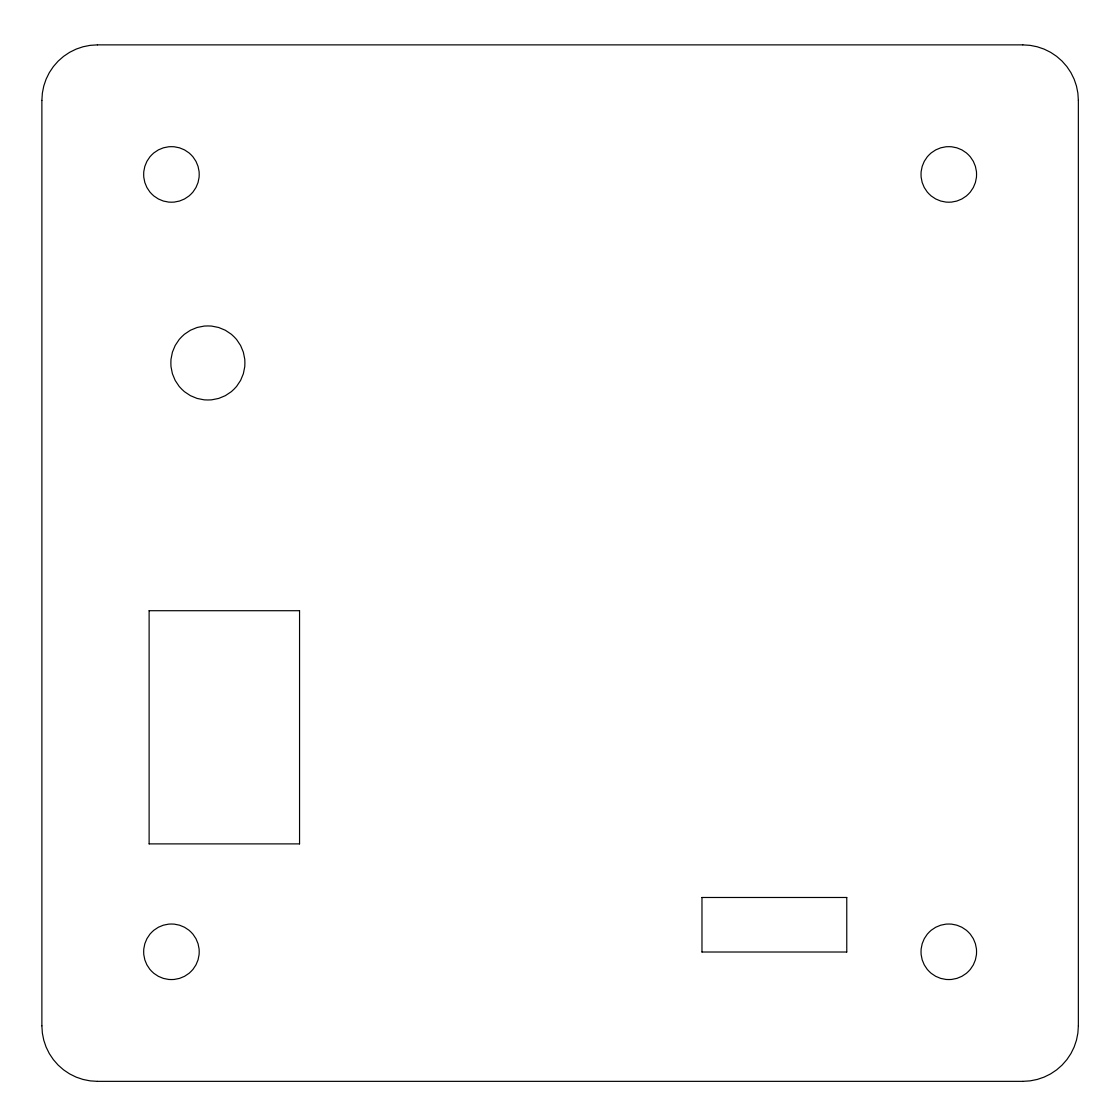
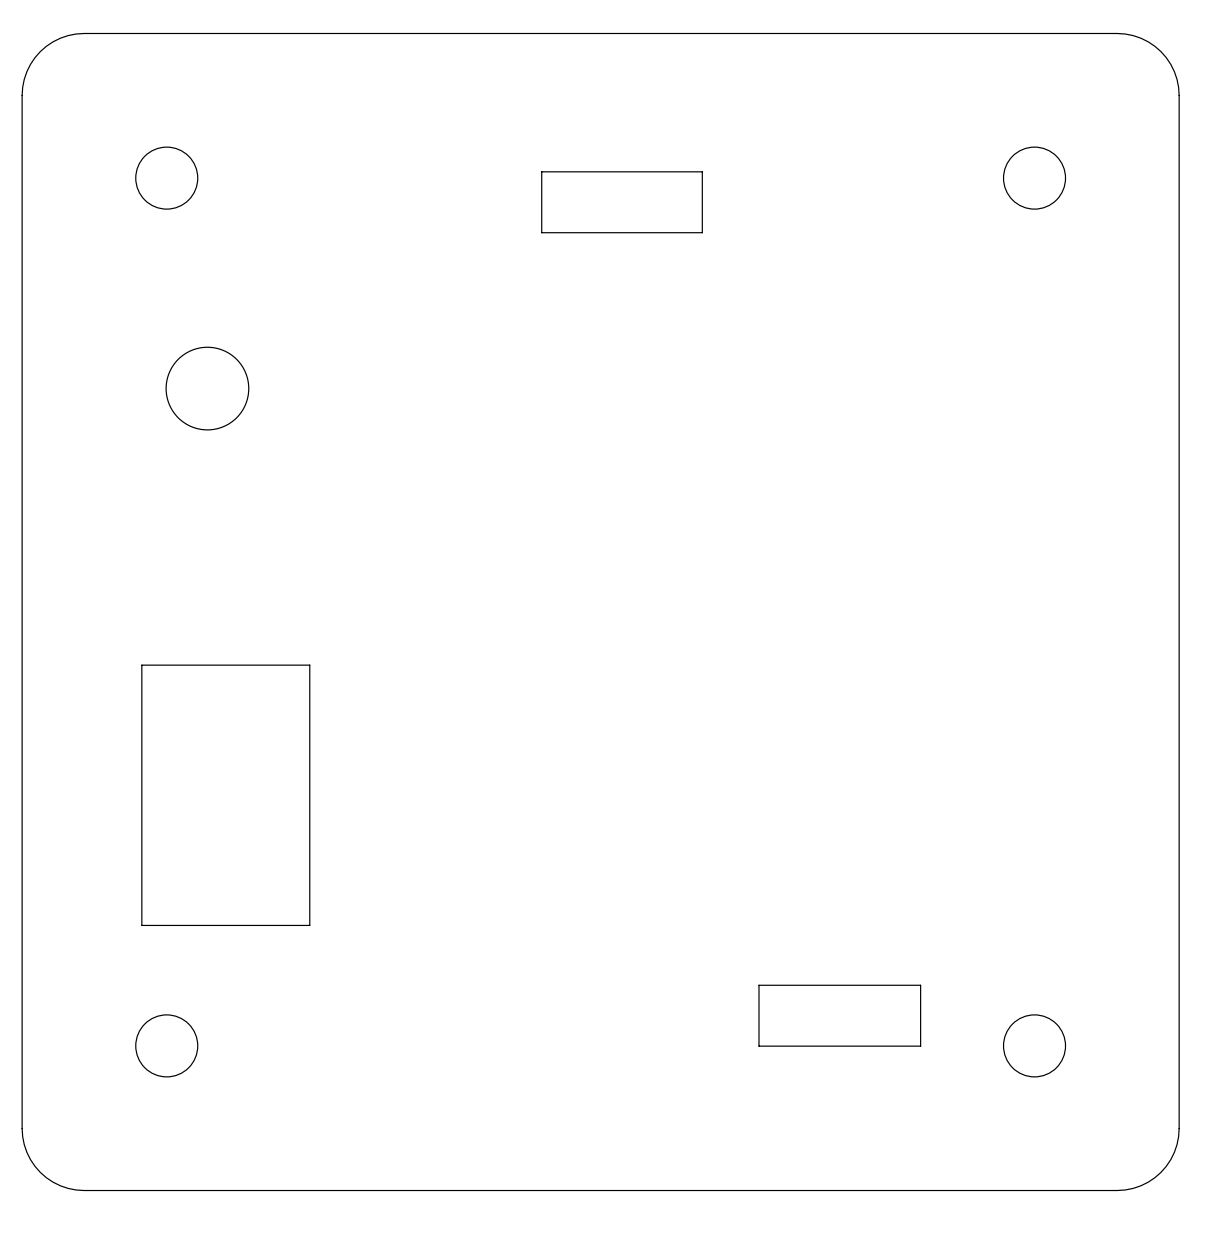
board edge: none -> (541, 171) (702, 171) (702, 232) (541, 232) (541, 171)

